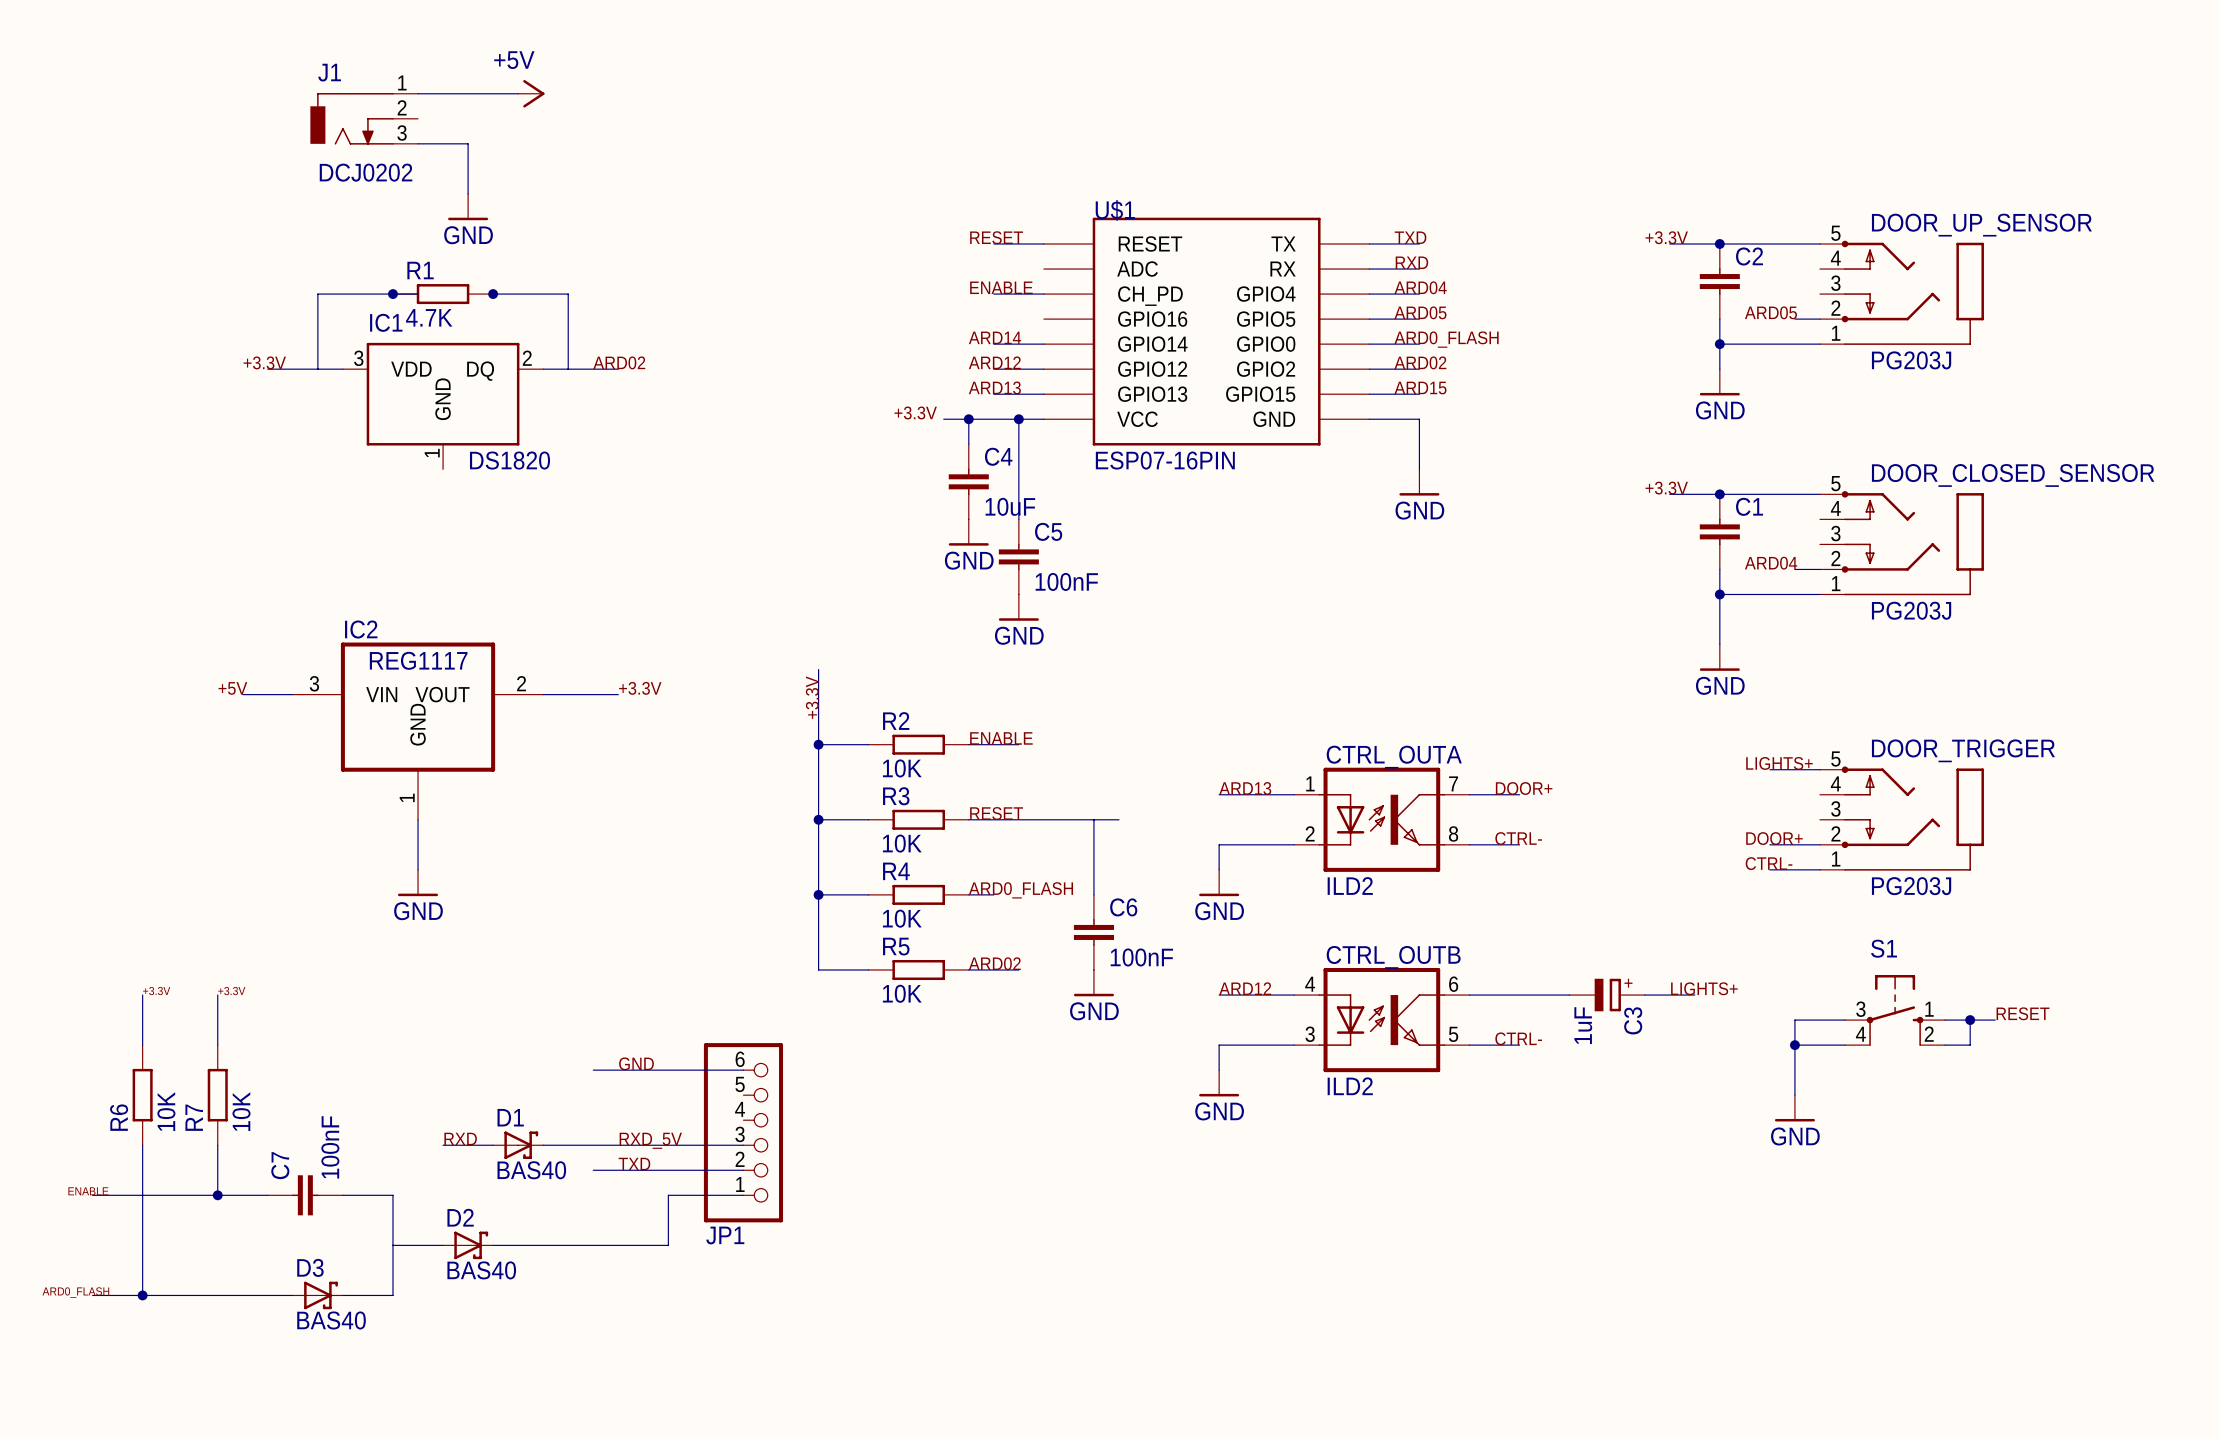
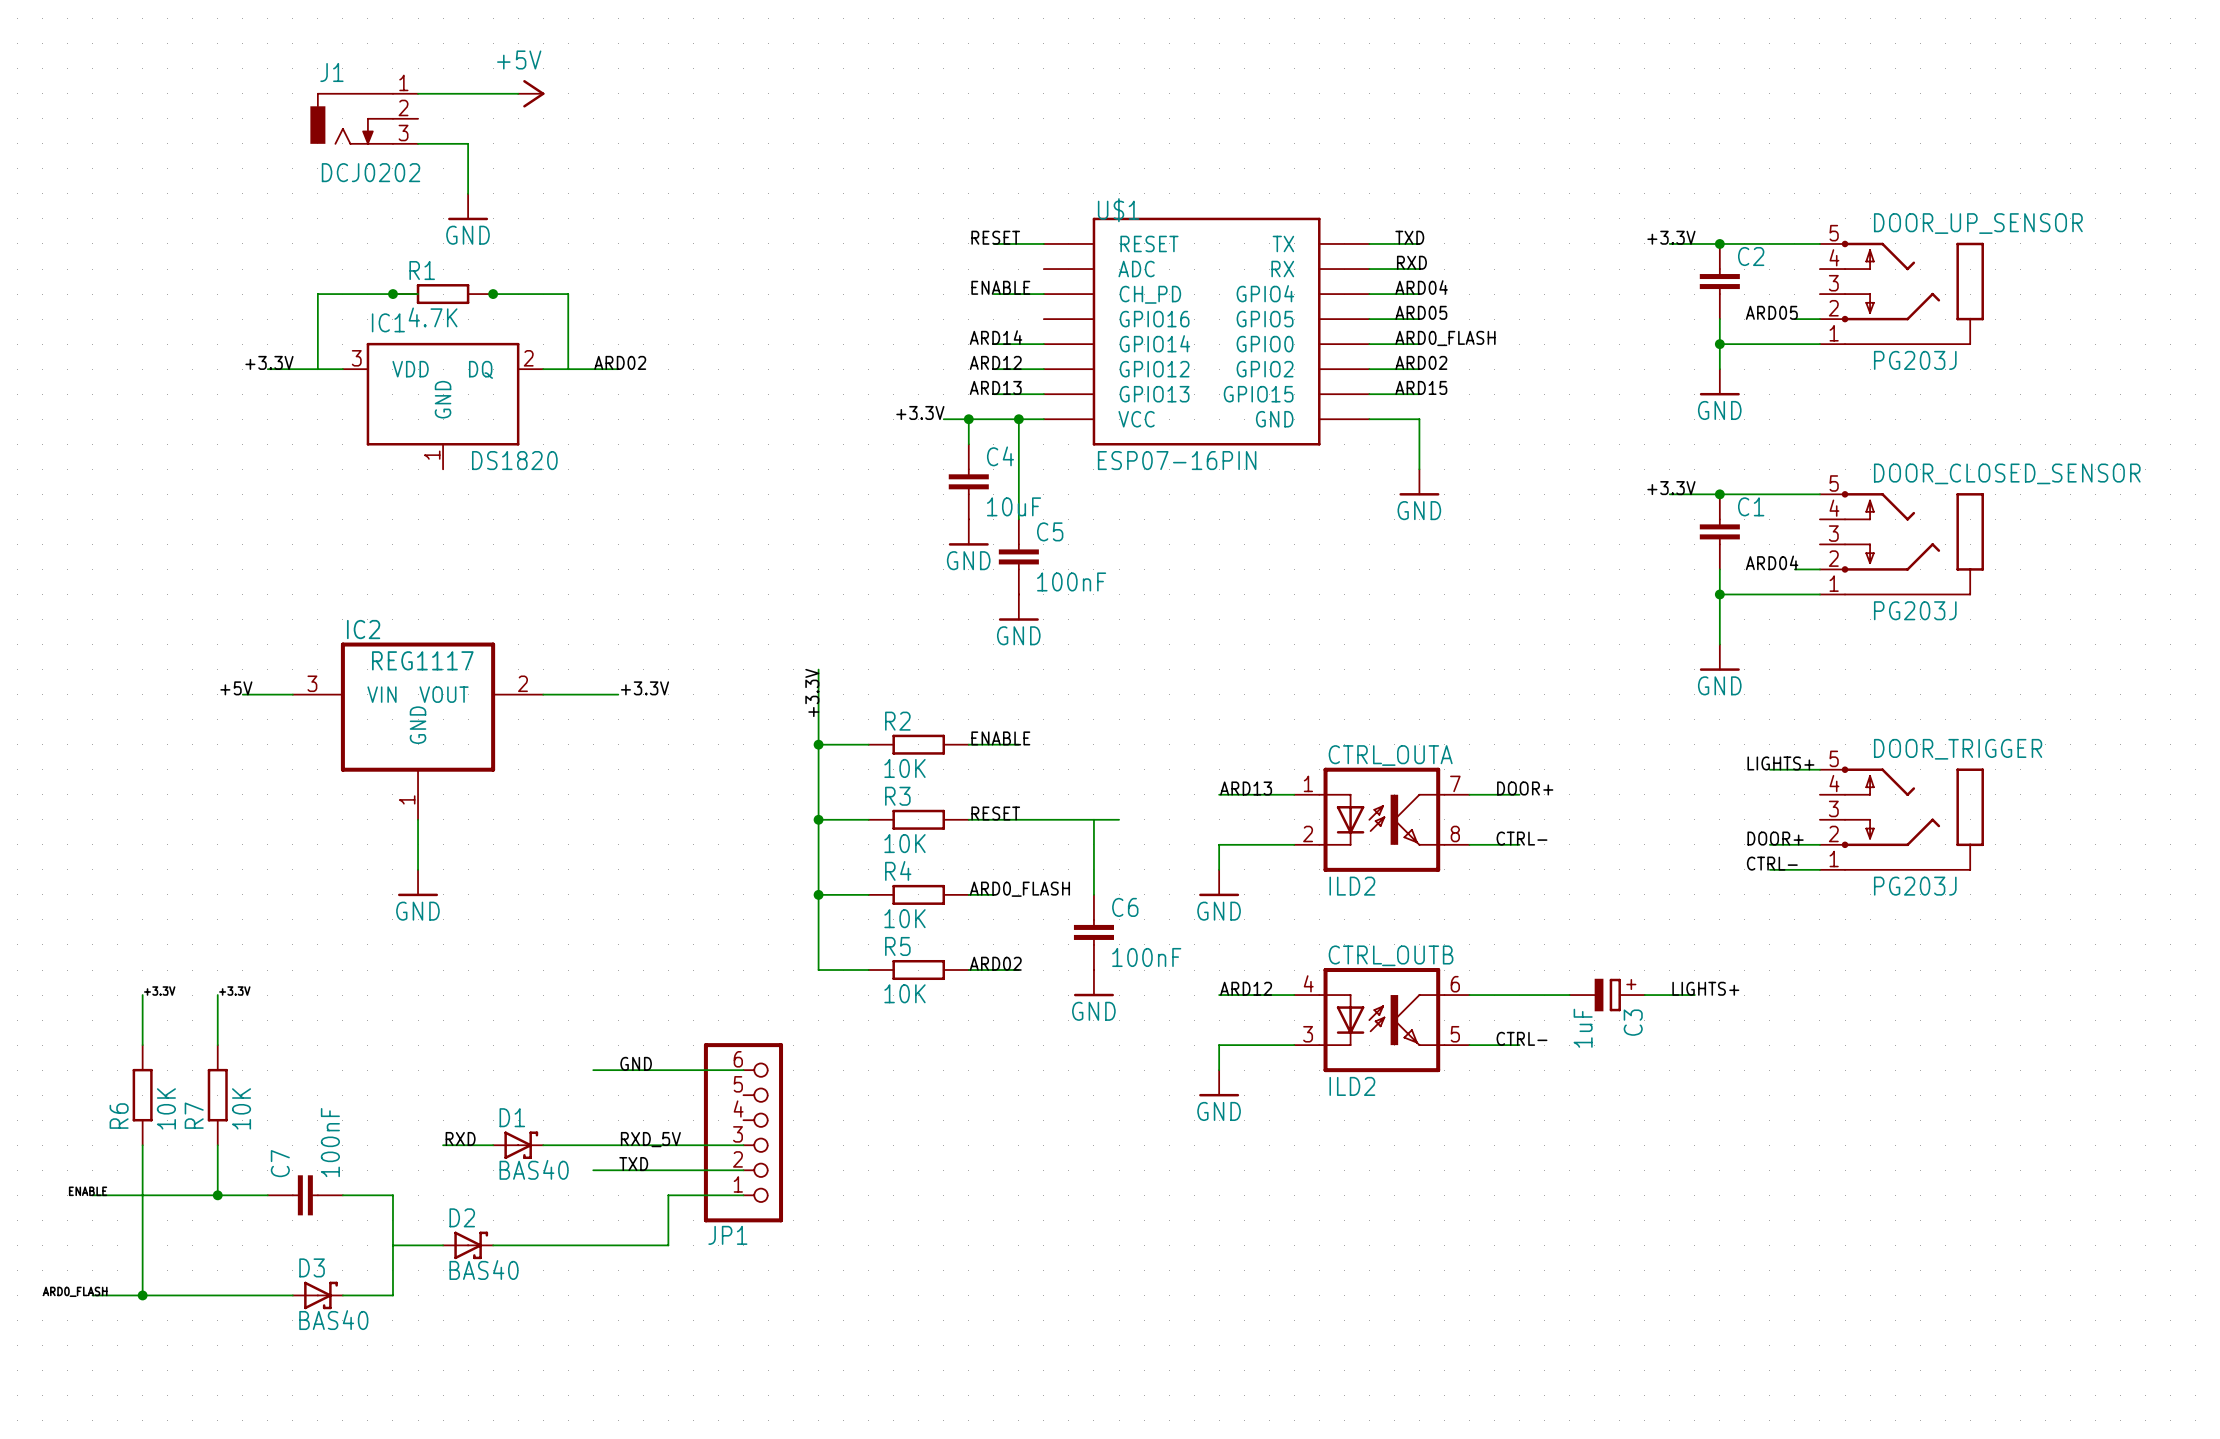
S1: (1895, 1010) -> none
label: RESET (2023, 1013) -> none
wire: (1845, 1020) (1794, 1020) (1794, 1095) -> none
wire: (1945, 1020) (1995, 1020) -> none
wire: (1970, 1020) (1970, 1045) (1945, 1045) -> none
junction: (1970, 1020) -> none
wire: (1794, 1045) (1845, 1045) -> none
junction: (1794, 1045) -> none
power symbol: GND (1794, 1108) -> none

